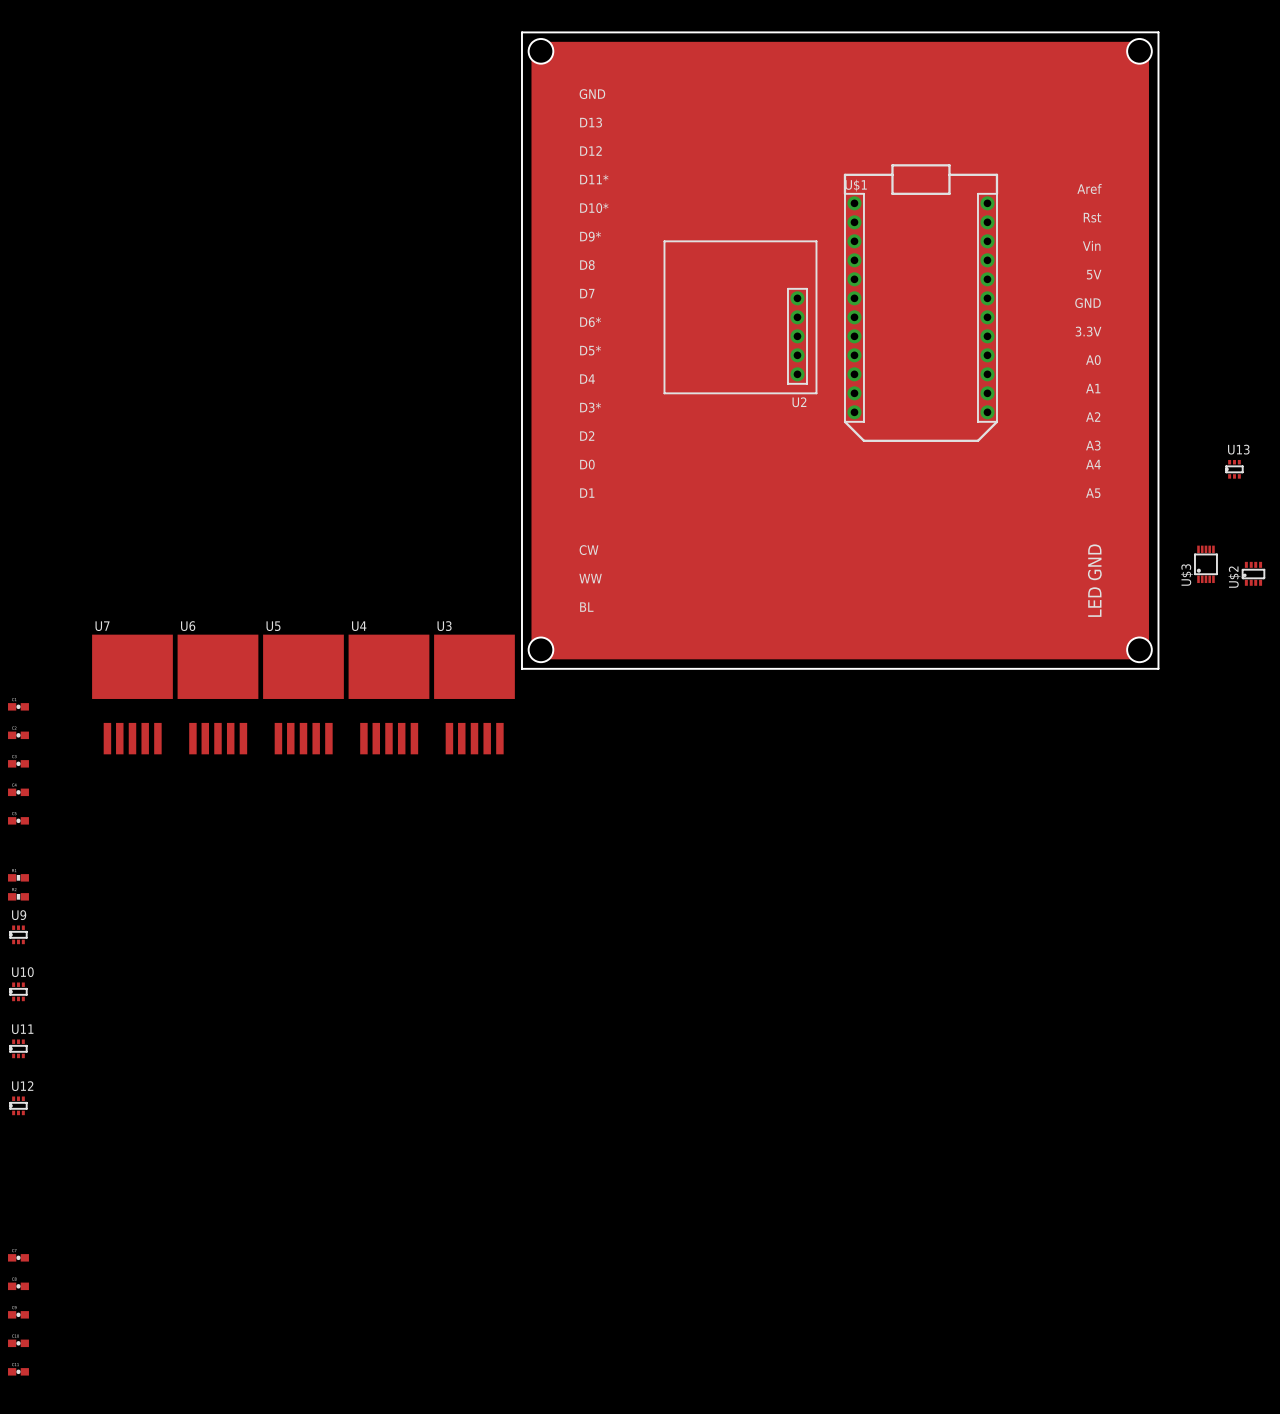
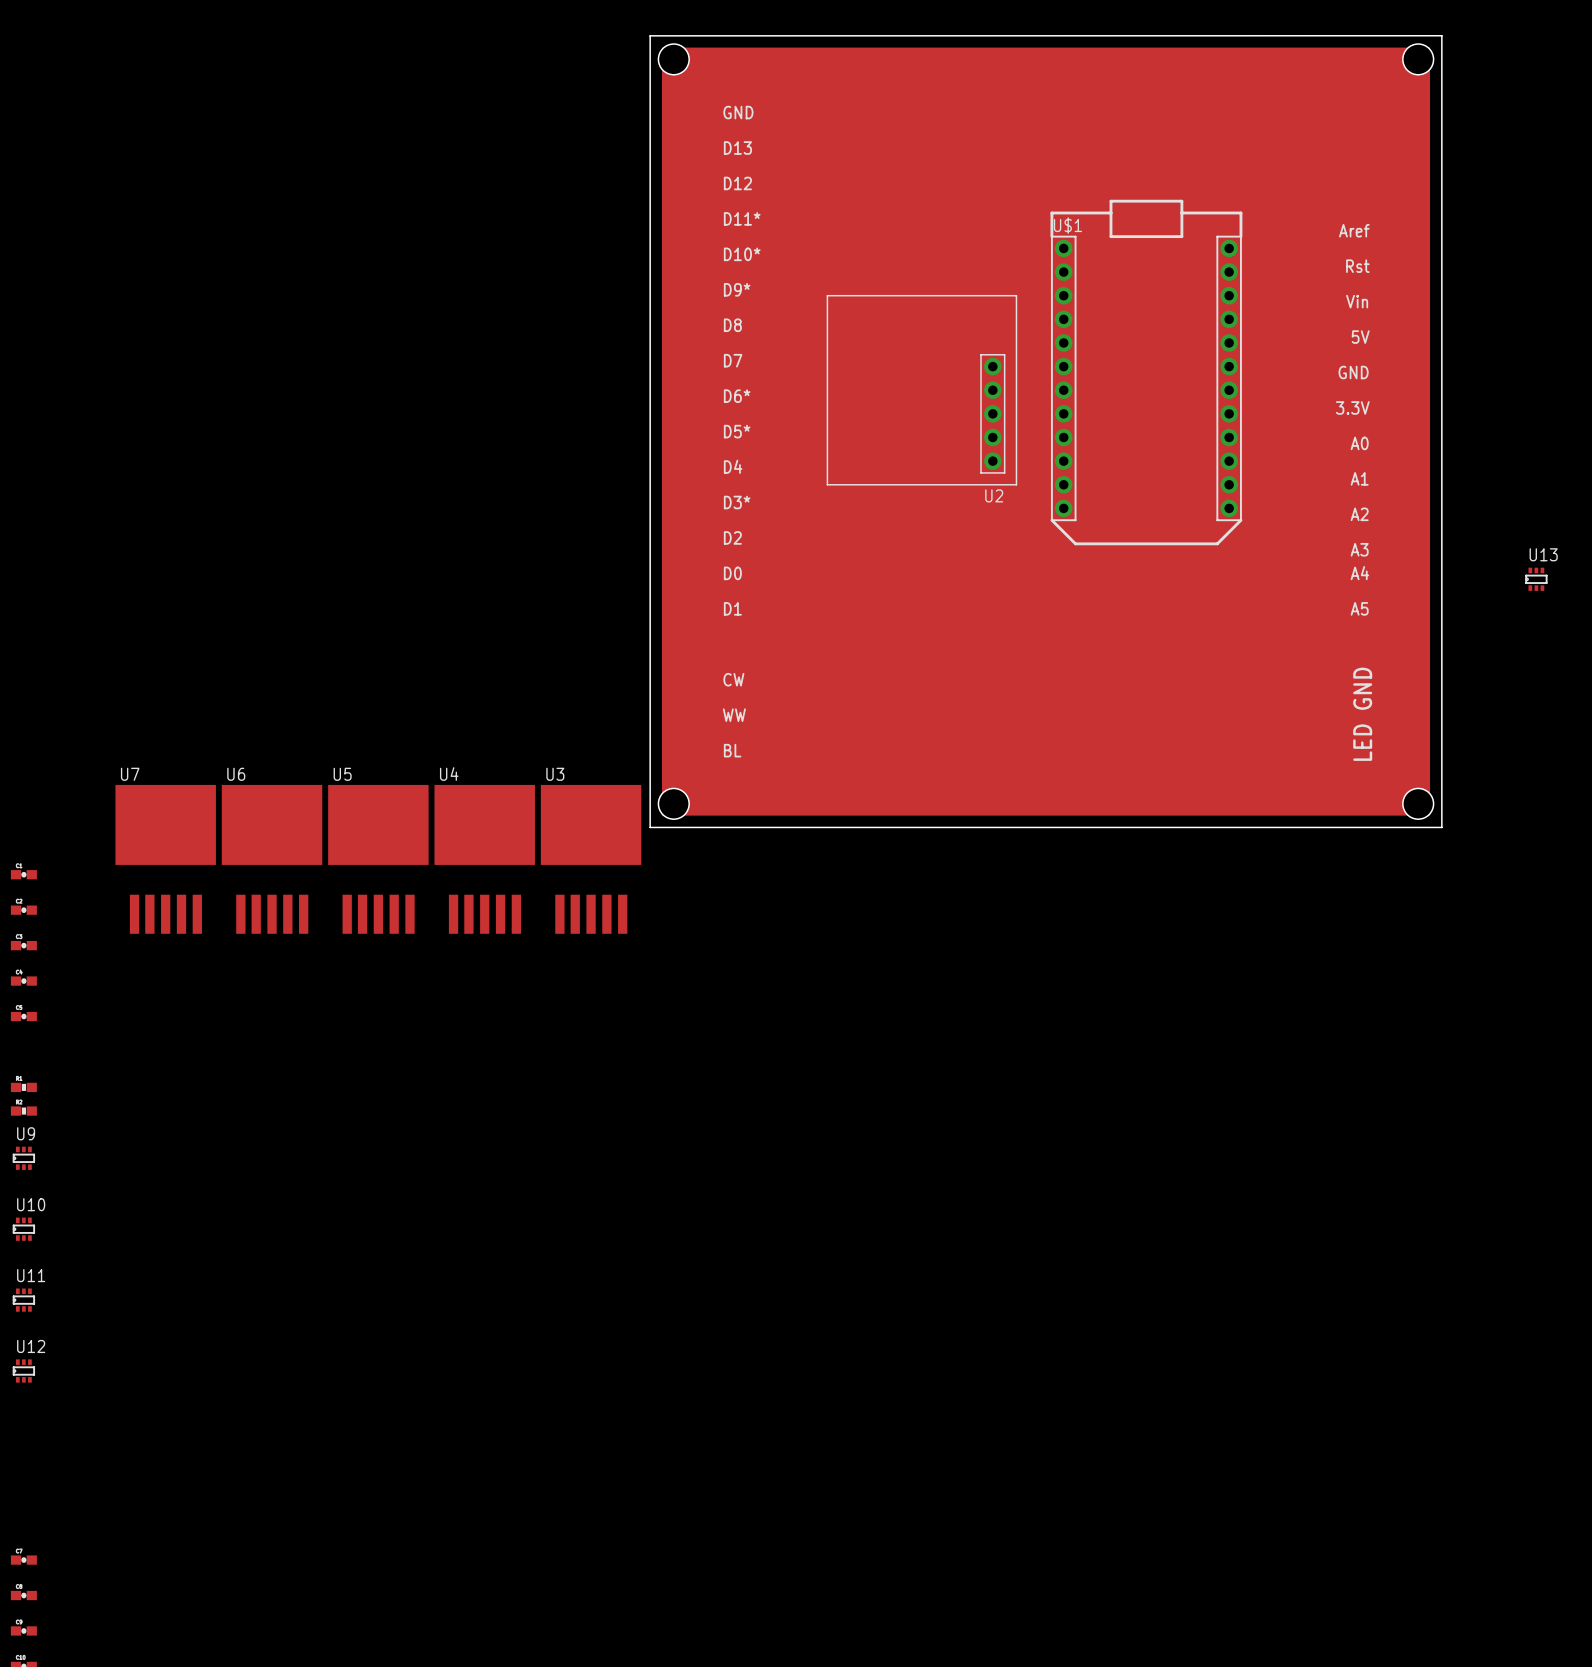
U$3: (1205, 564) -> none
U$2: (1253, 573) -> none

